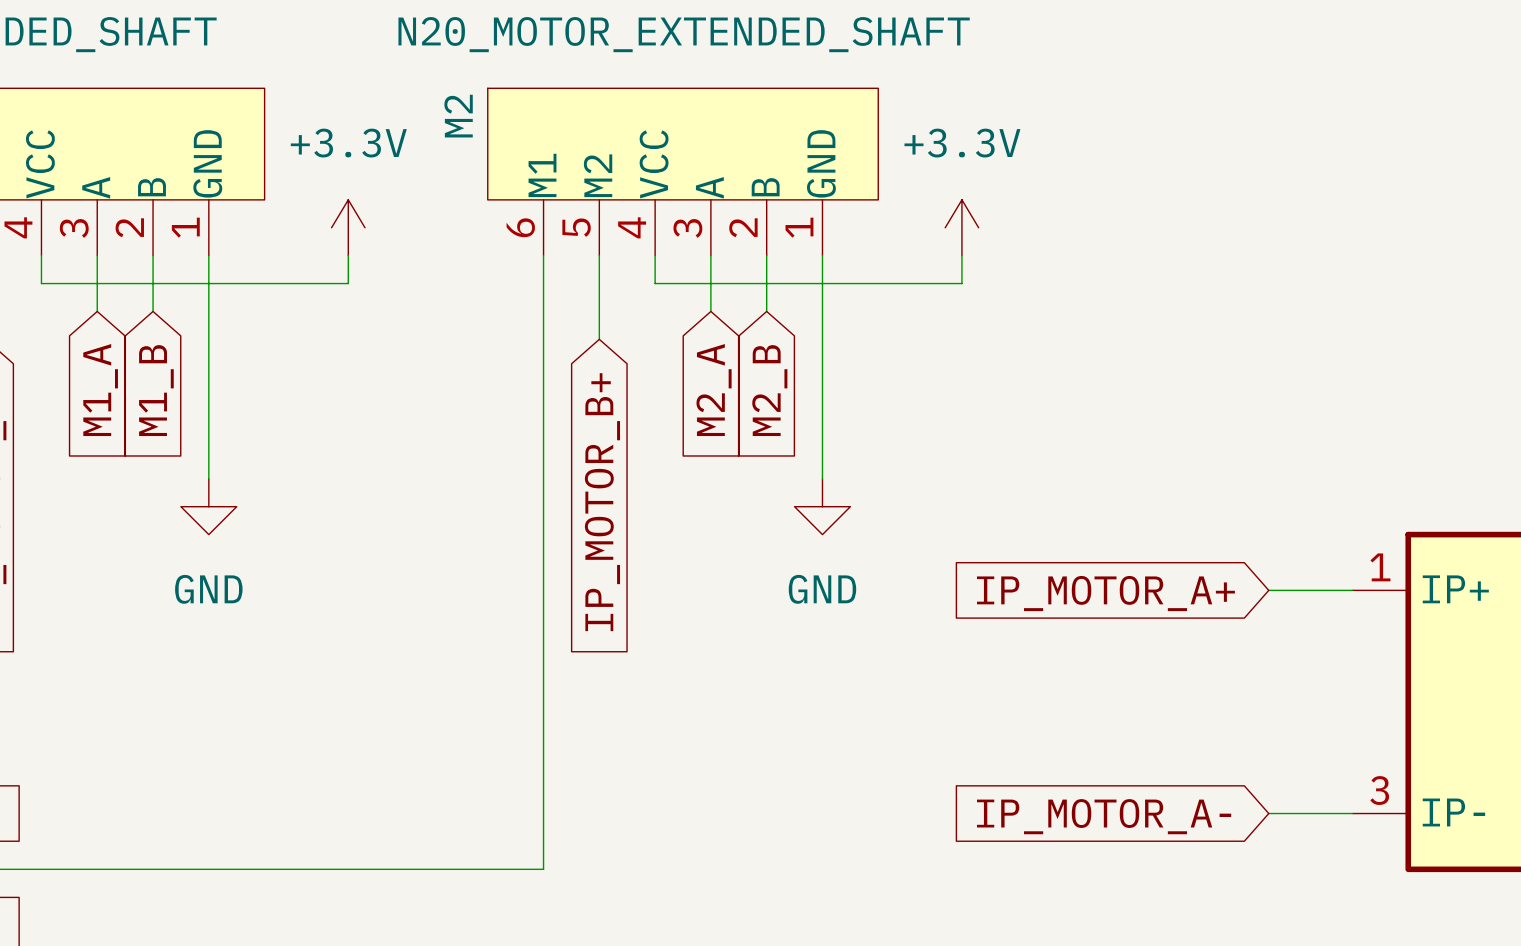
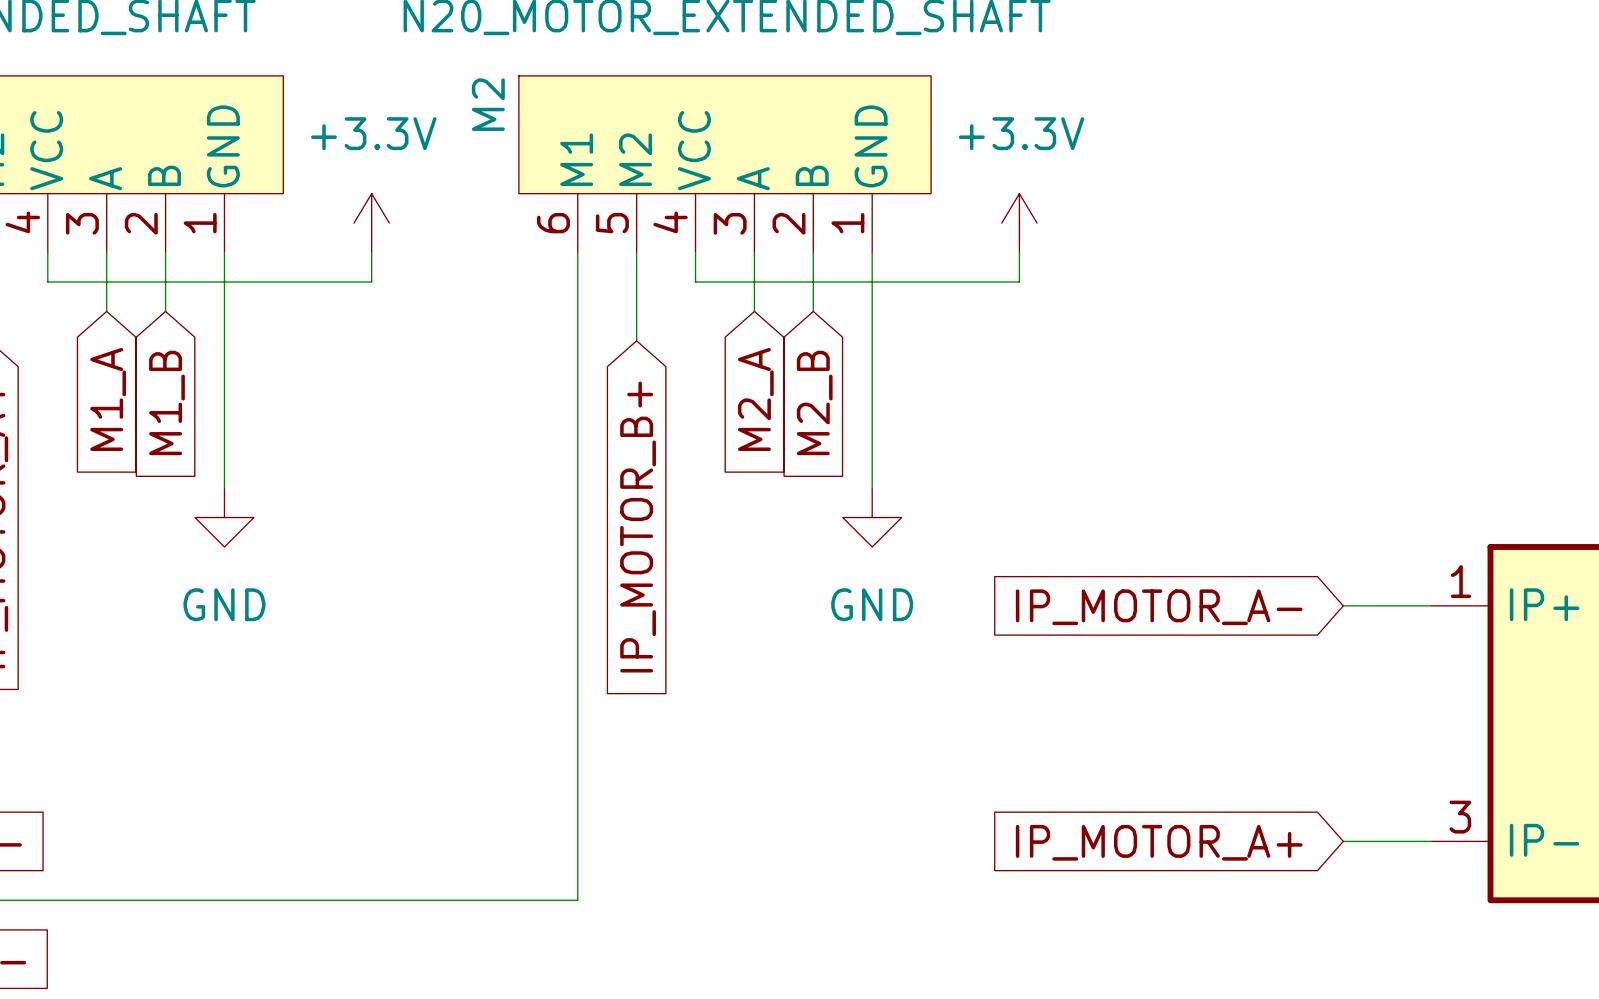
global label: IP_MOTOR_A+ (1105, 593) -> IP_MOTOR_A- (1159, 607)
global label: IP_MOTOR_A- (1104, 816) -> IP_MOTOR_A+ (1159, 842)

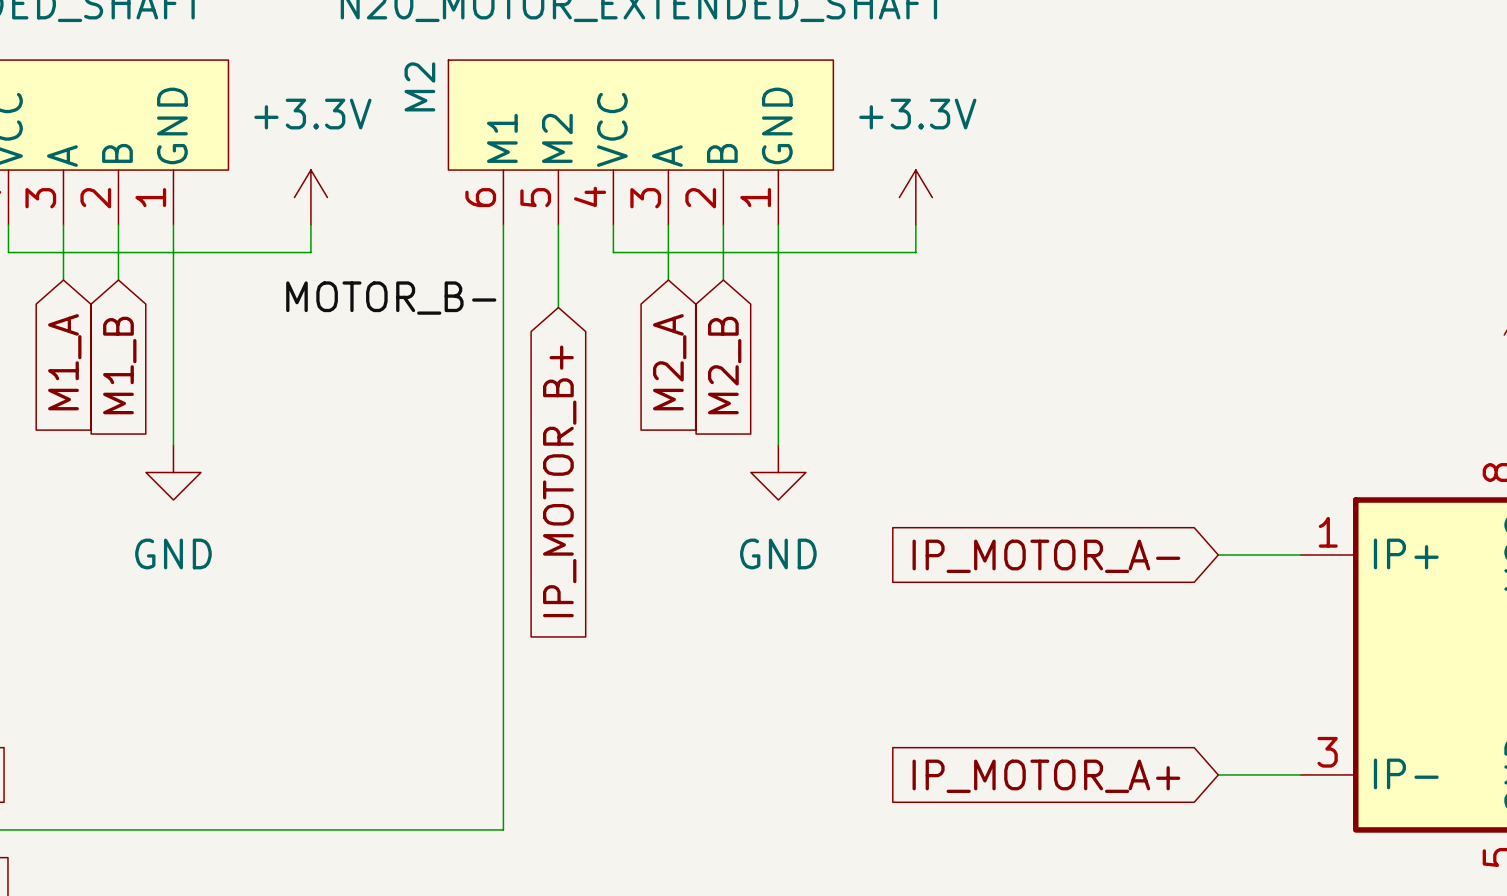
label: none -> MOTOR_B- (391, 298)

